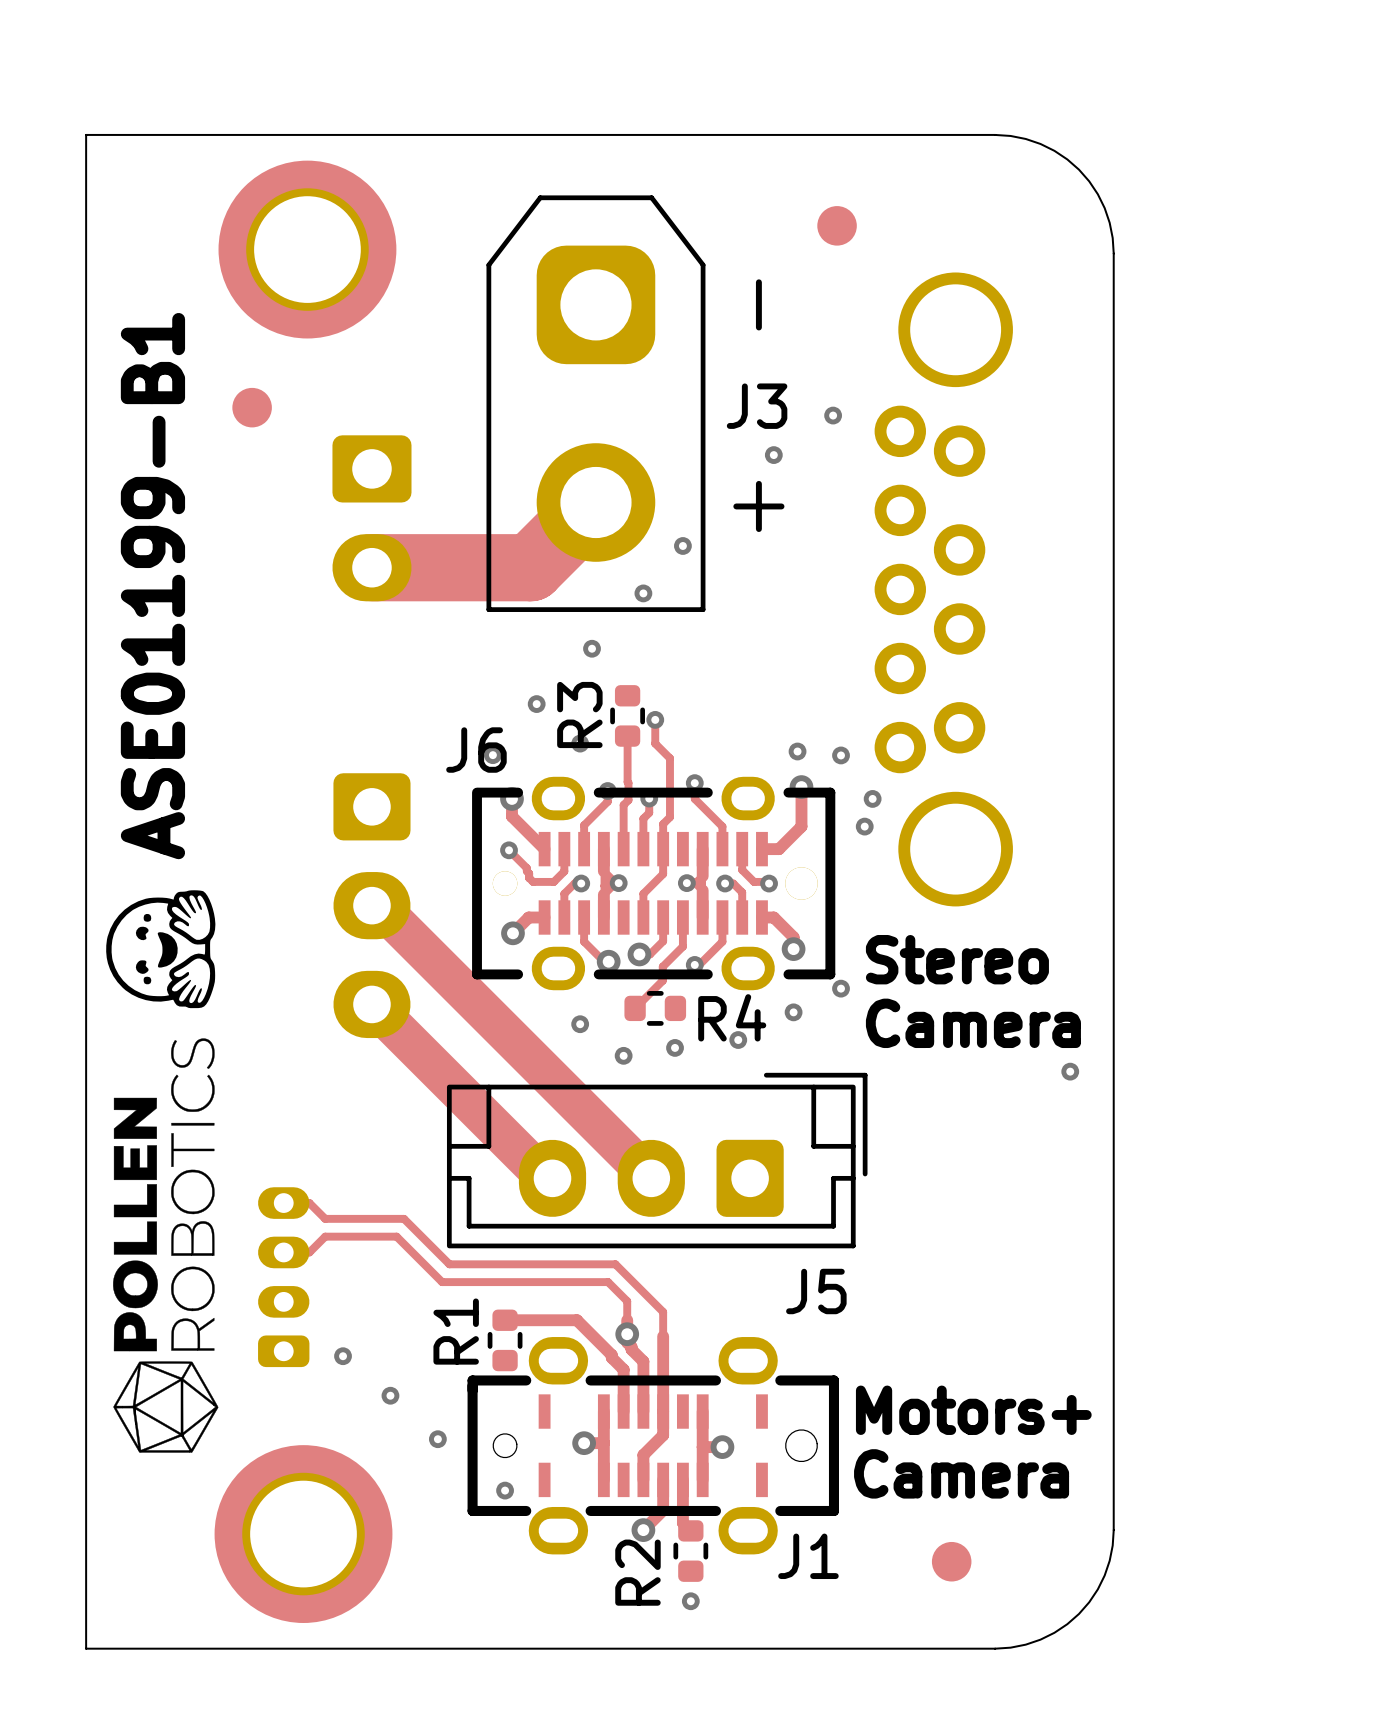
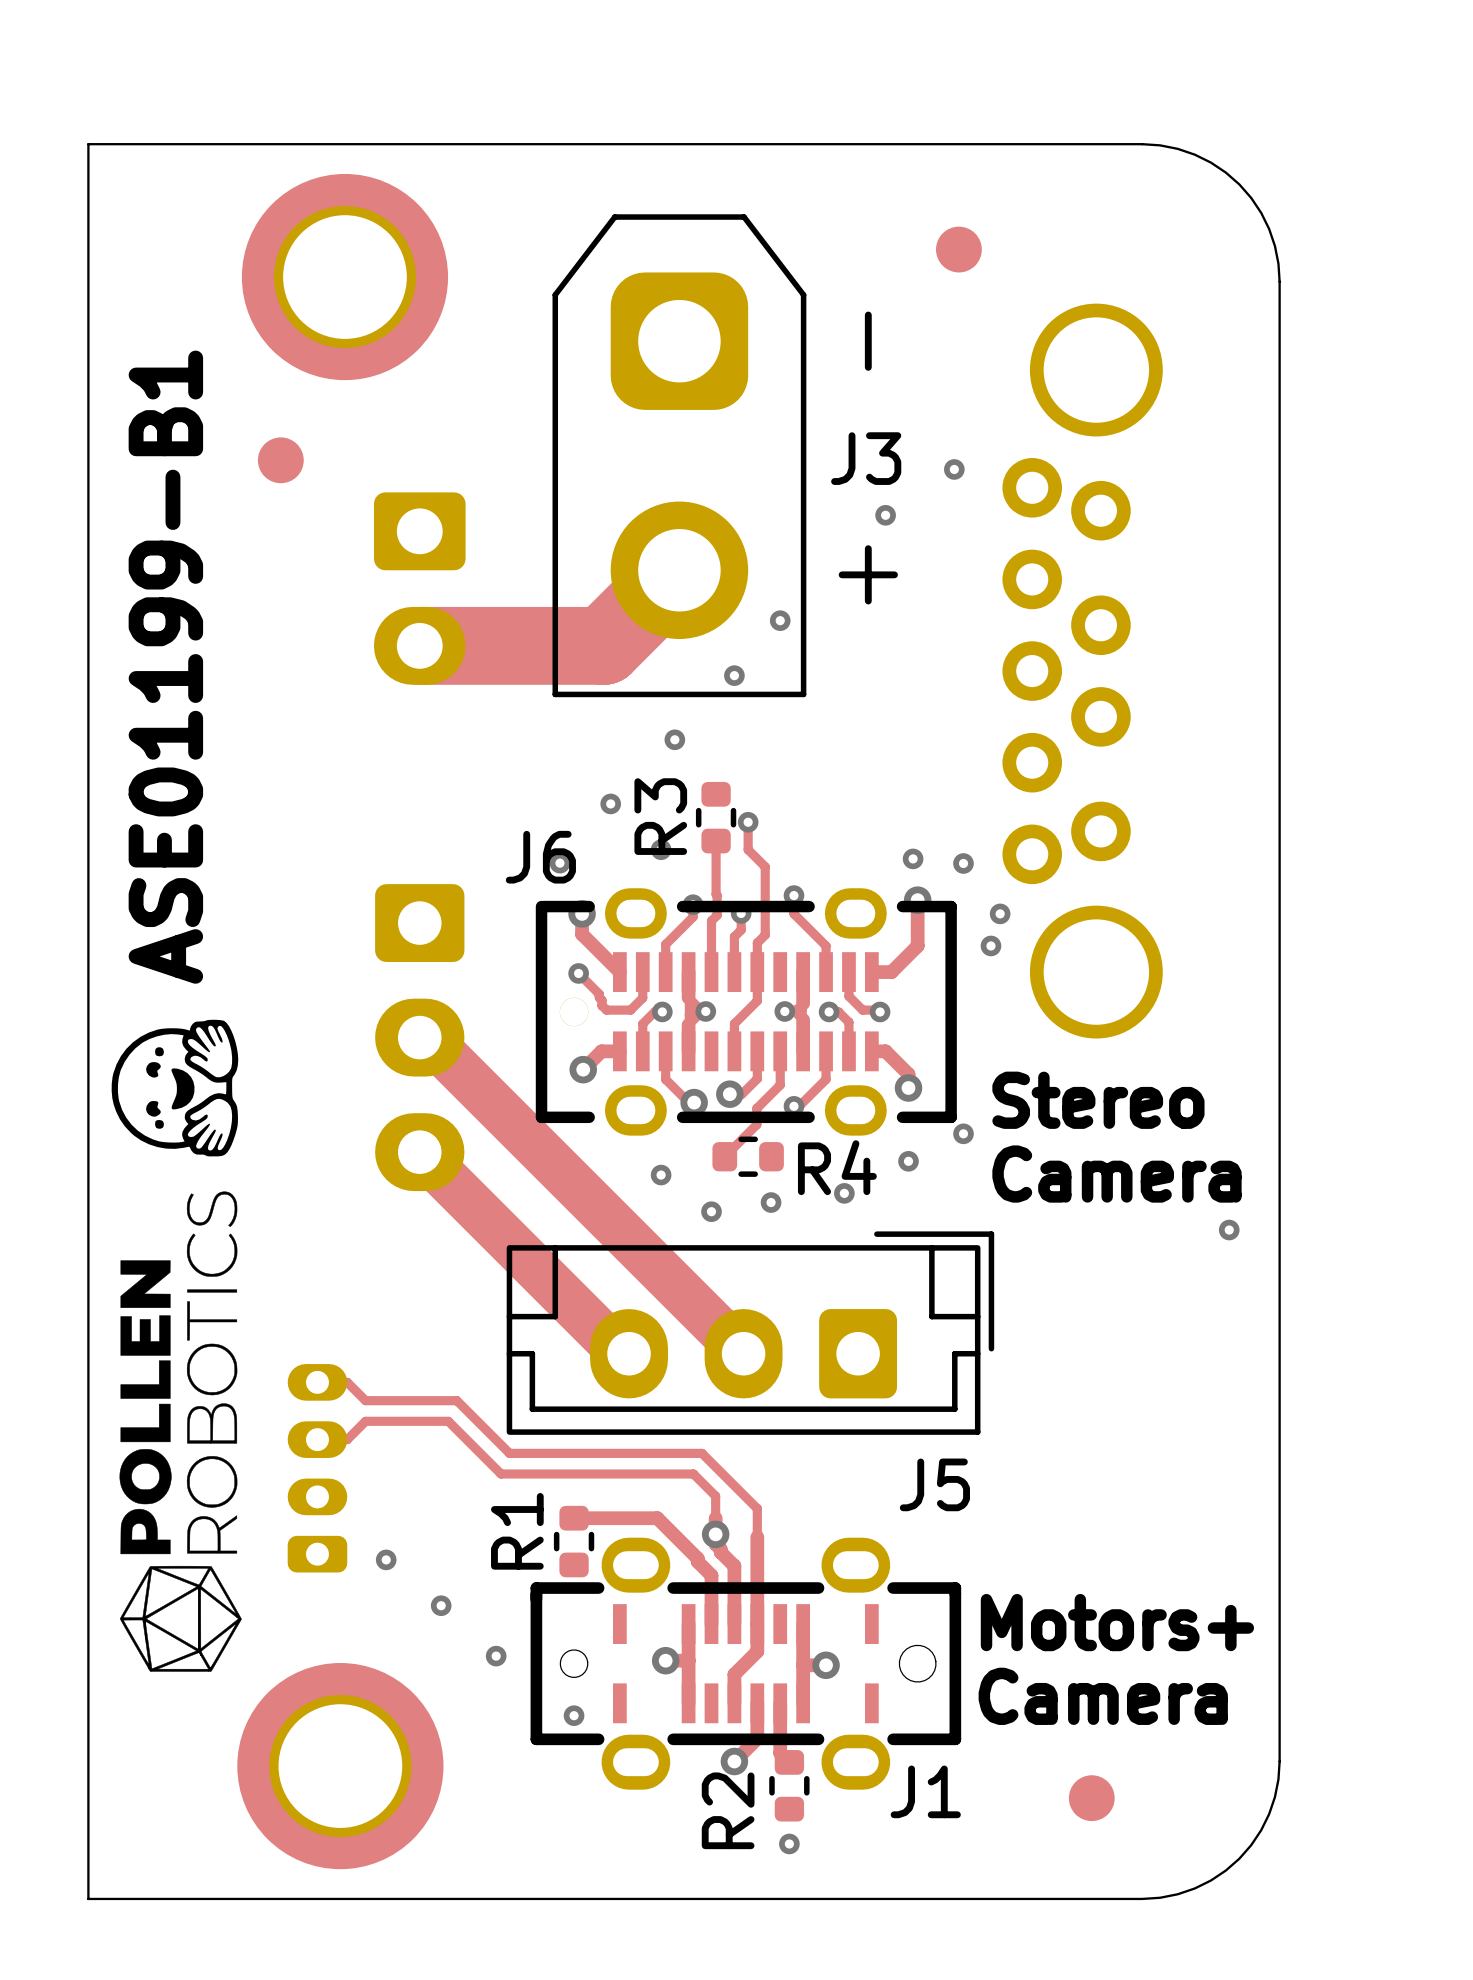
J6 footprint: [472, 776, 836, 991] -> [535, 888, 957, 1136]

